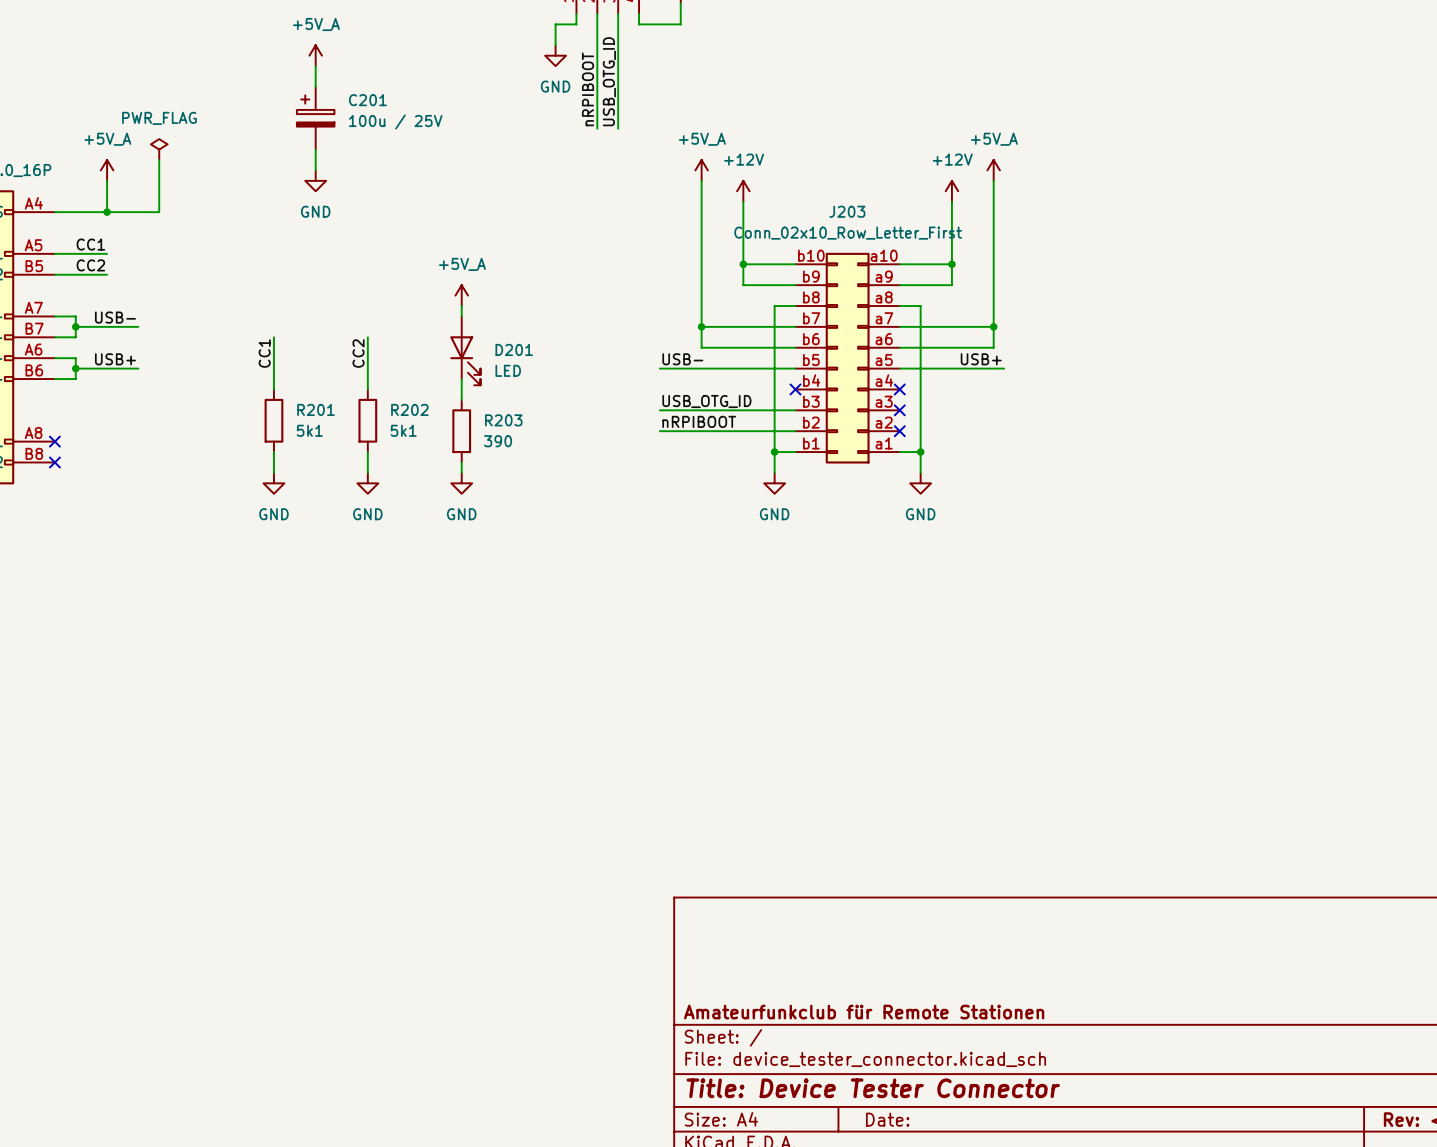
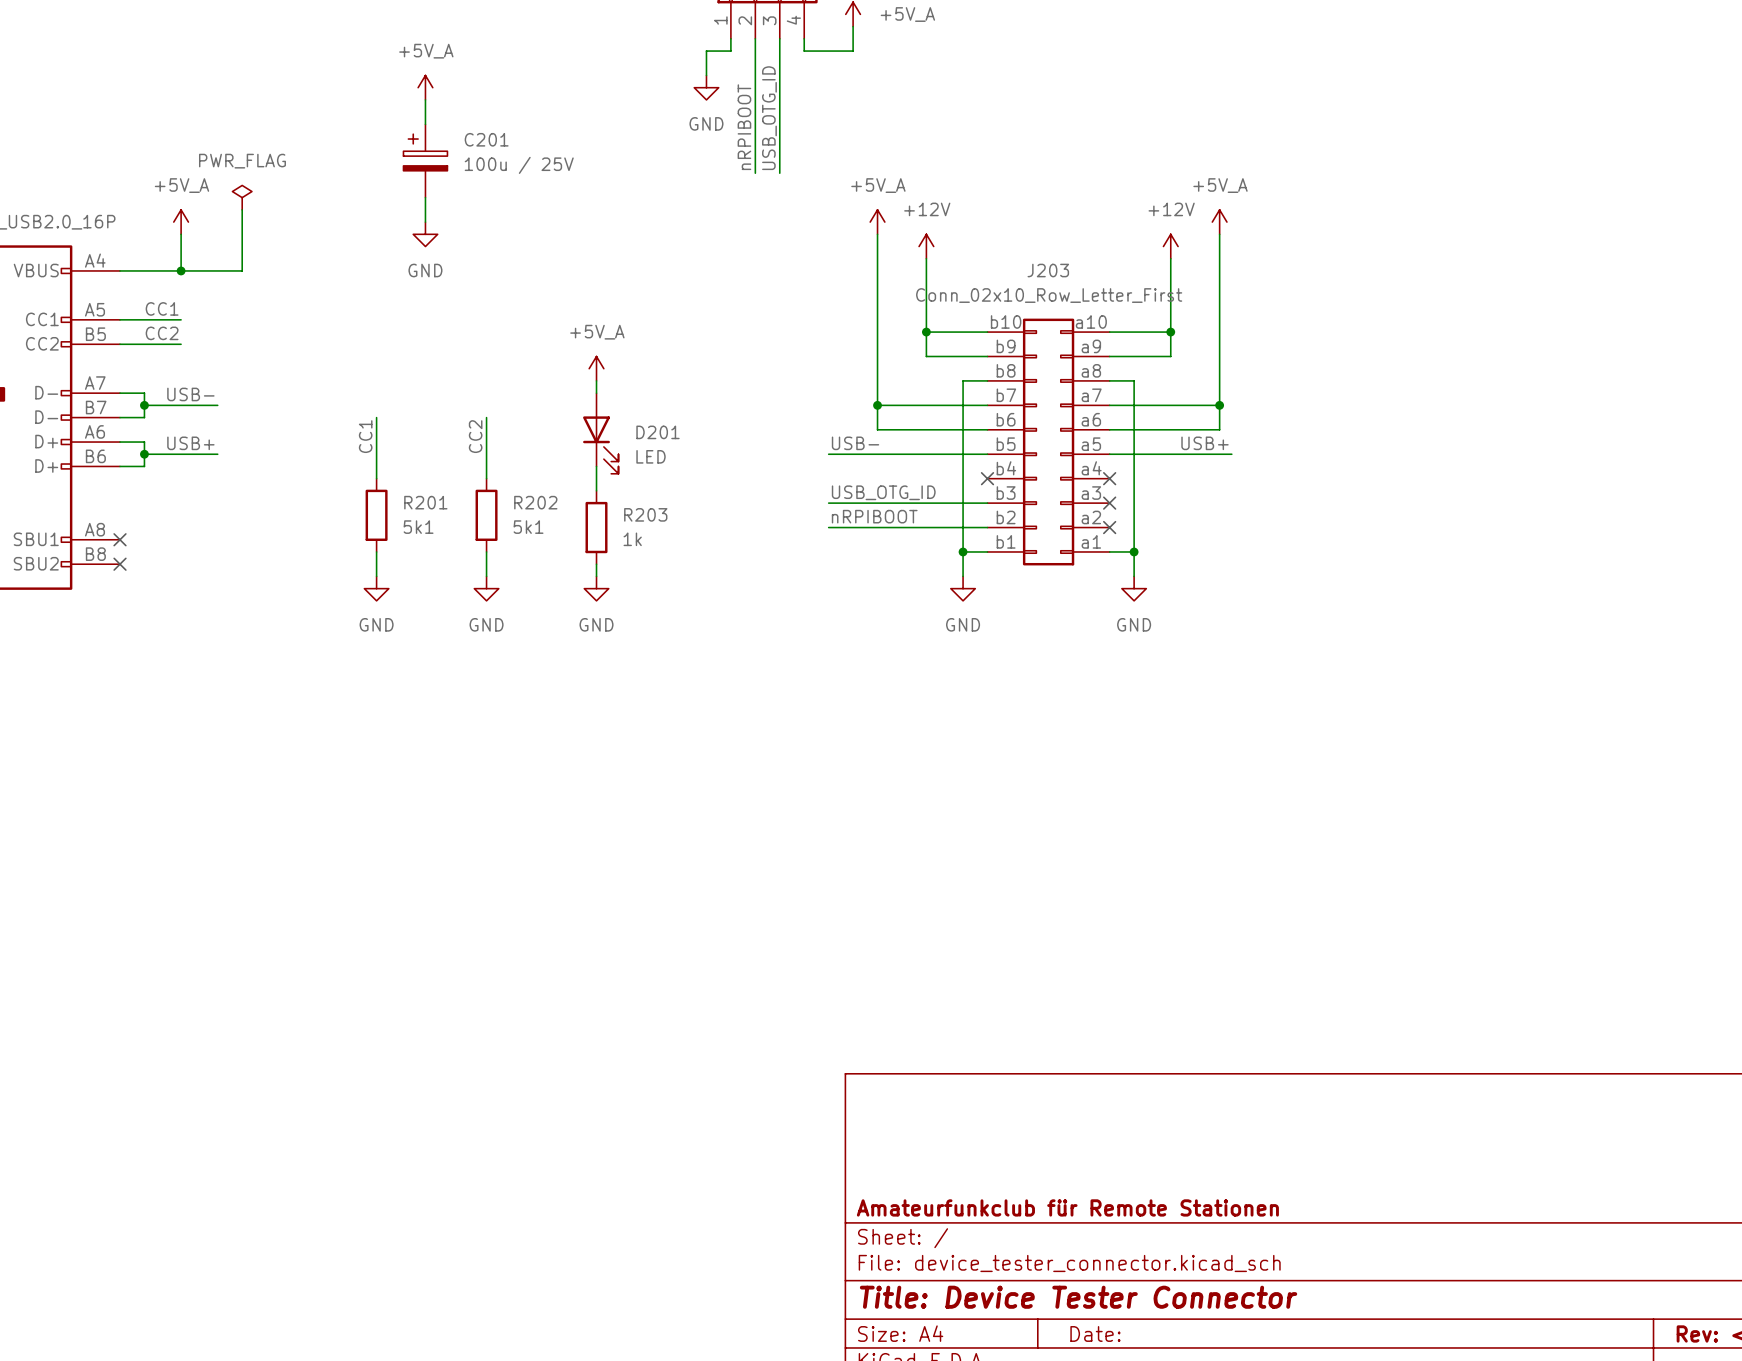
R203 value: 390 (498, 441) -> 1k (632, 539)

